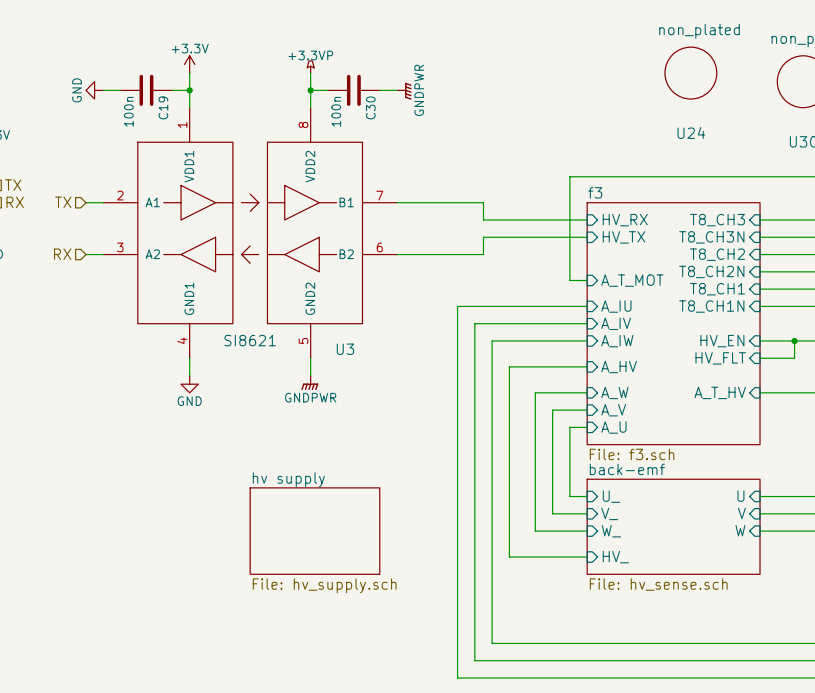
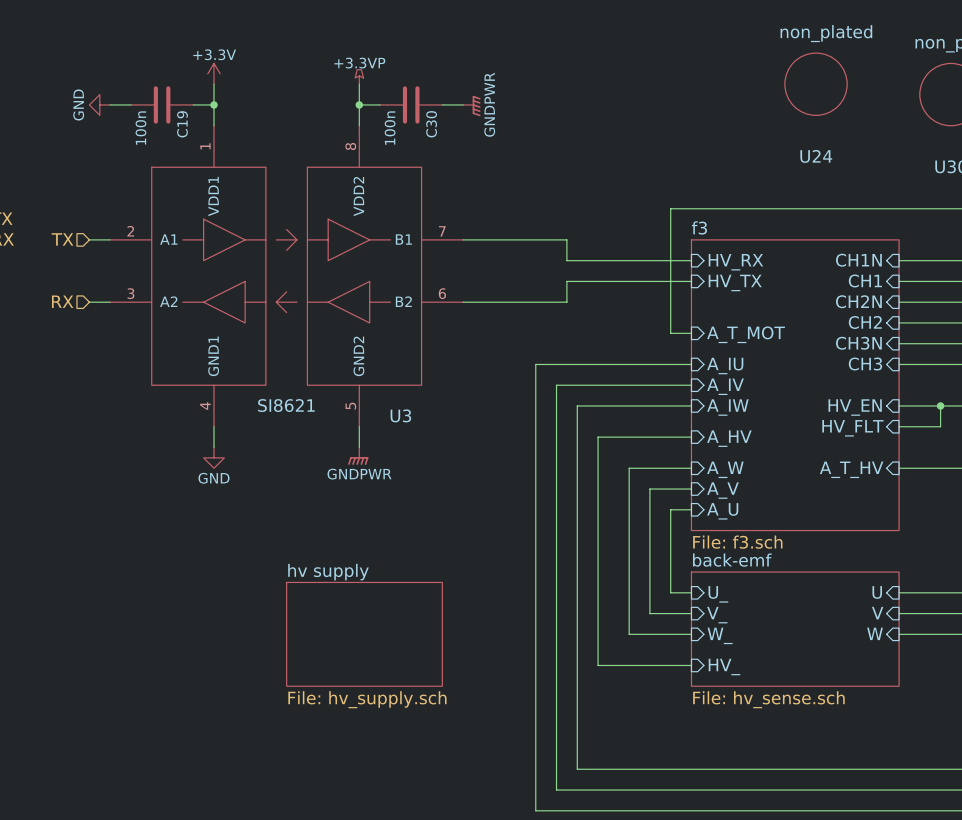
sheet pin: T8_CH3 (717, 220) -> CH1N (858, 260)
sheet pin: T8_CH3N (711, 237) -> CH1 (865, 280)
sheet pin: T8_CH2 (717, 254) -> CH2N (858, 301)
sheet pin: T8_CH2N (711, 271) -> CH2 (865, 322)
sheet pin: T8_CH1 (717, 289) -> CH3N (858, 343)
sheet pin: T8_CH1N (711, 306) -> CH3 (865, 364)

